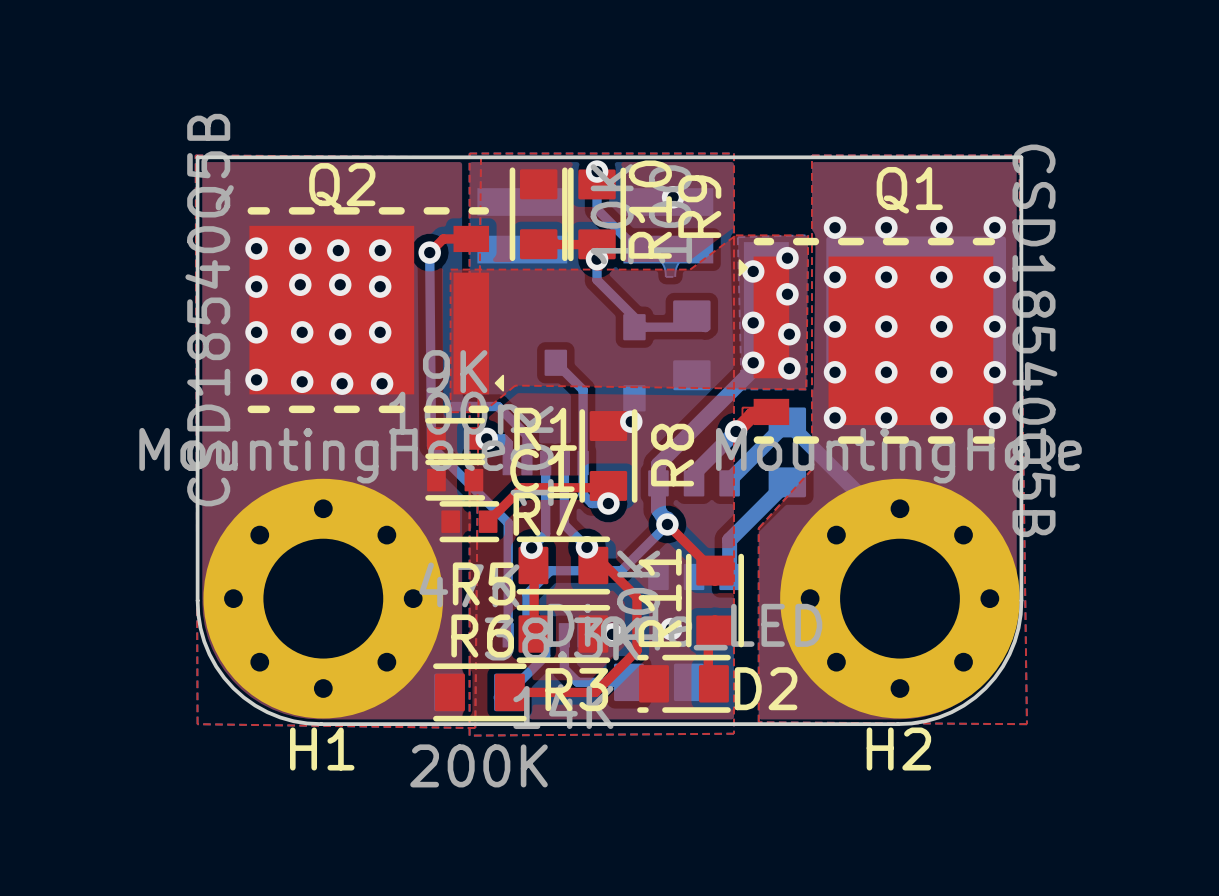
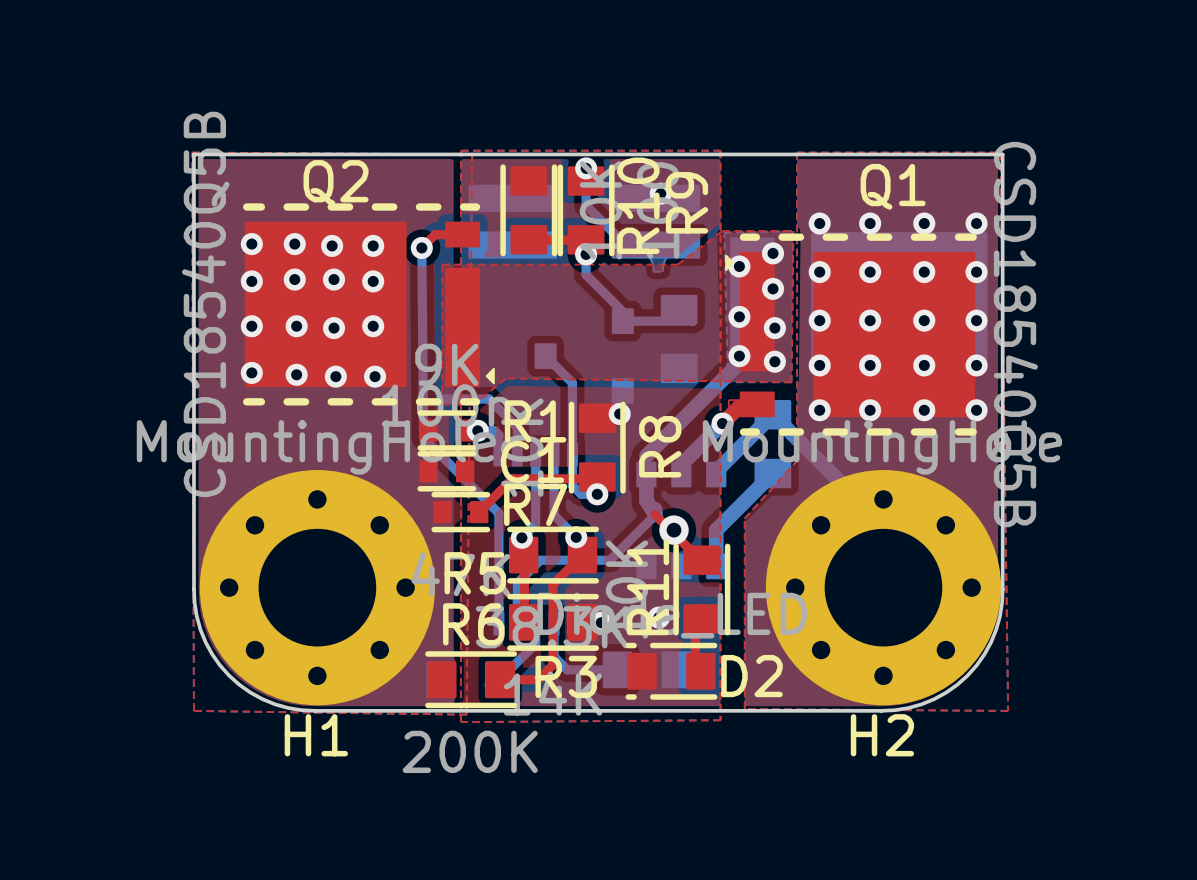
via position: (667, 524) -> (674, 530)
top track: (586, 547) (636, 597) (636, 650) (595, 692) (548, 692) -> (582, 555) (553, 584) (553, 665) (538, 679)

